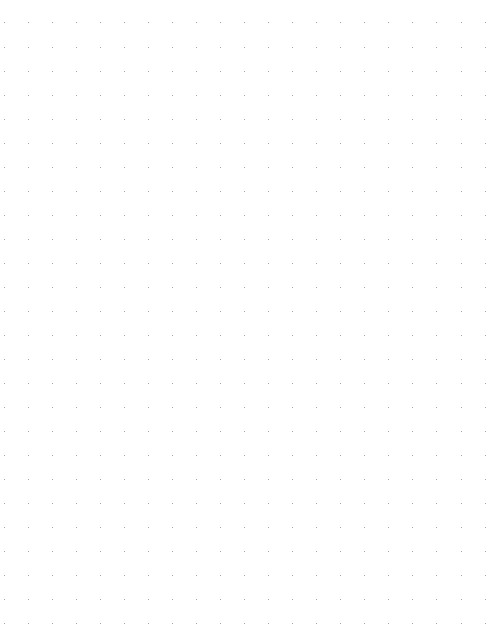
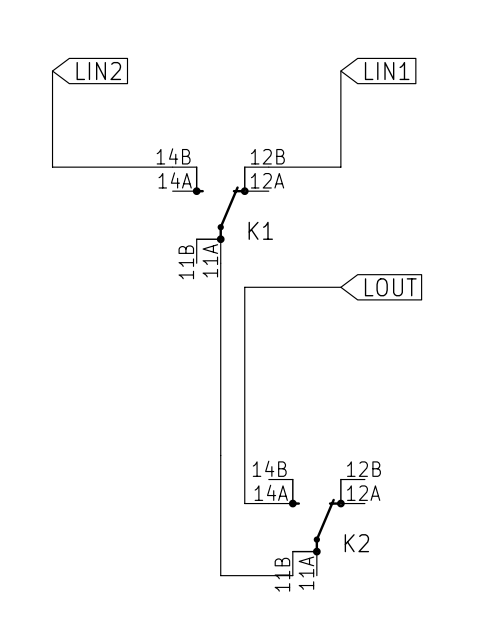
wire: none -> (52, 71) (52, 167) (172, 167)
global label: none -> LIN2 (98, 71)
wire: none -> (340, 71) (340, 167) (268, 167)
global label: none -> LIN1 (387, 71)
K1: none -> (220, 214)
wire: none -> (220, 263) (220, 575) (292, 575)
wire: none -> (340, 287) (244, 287) (244, 503) (268, 503)
global label: none -> LOUT (390, 287)
K2: none -> (316, 527)

